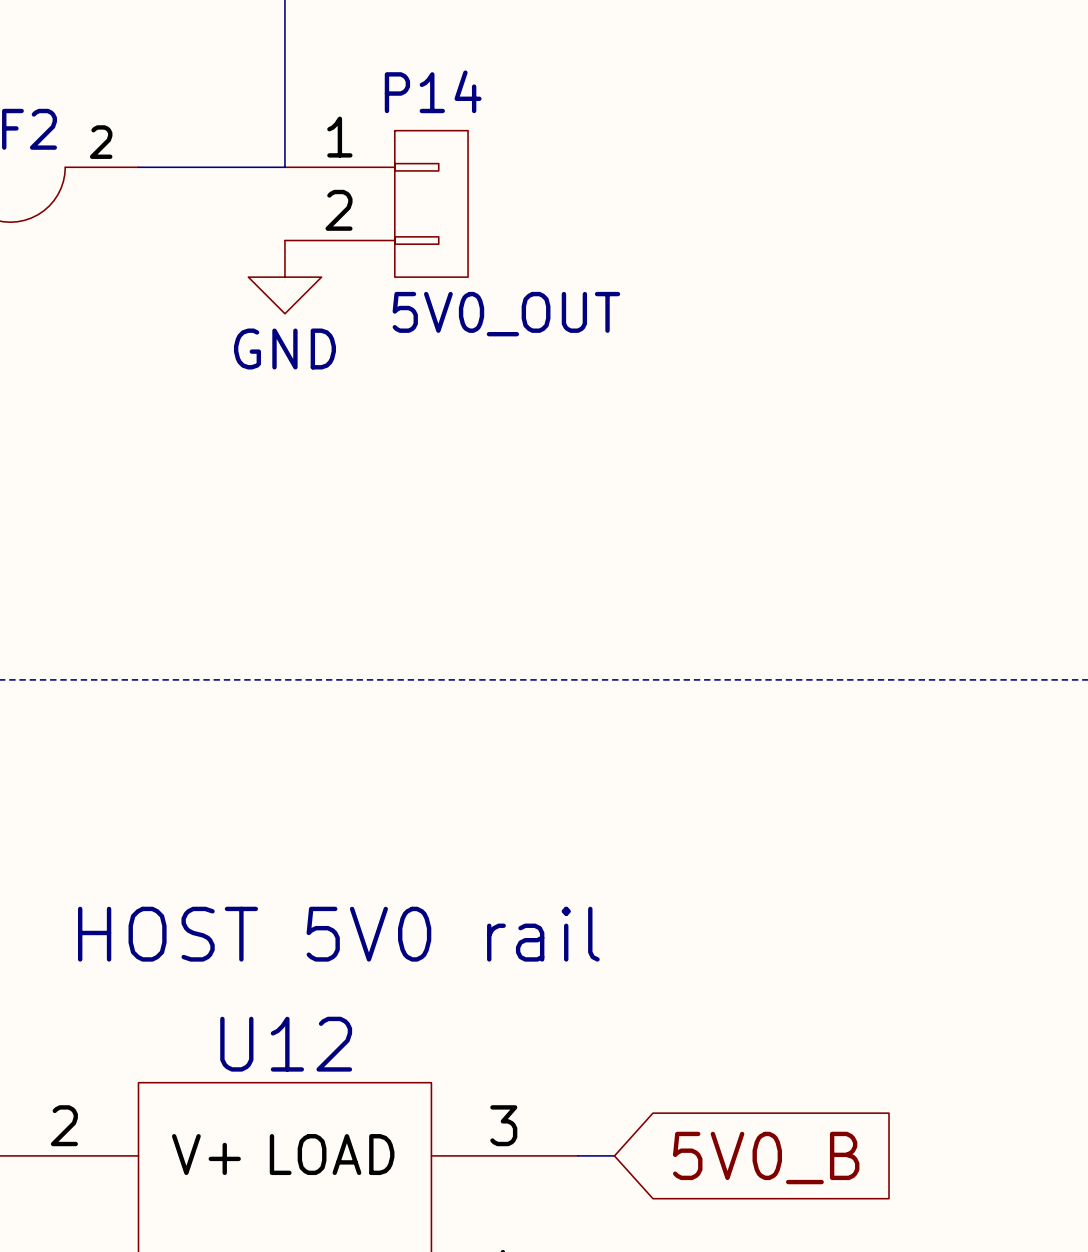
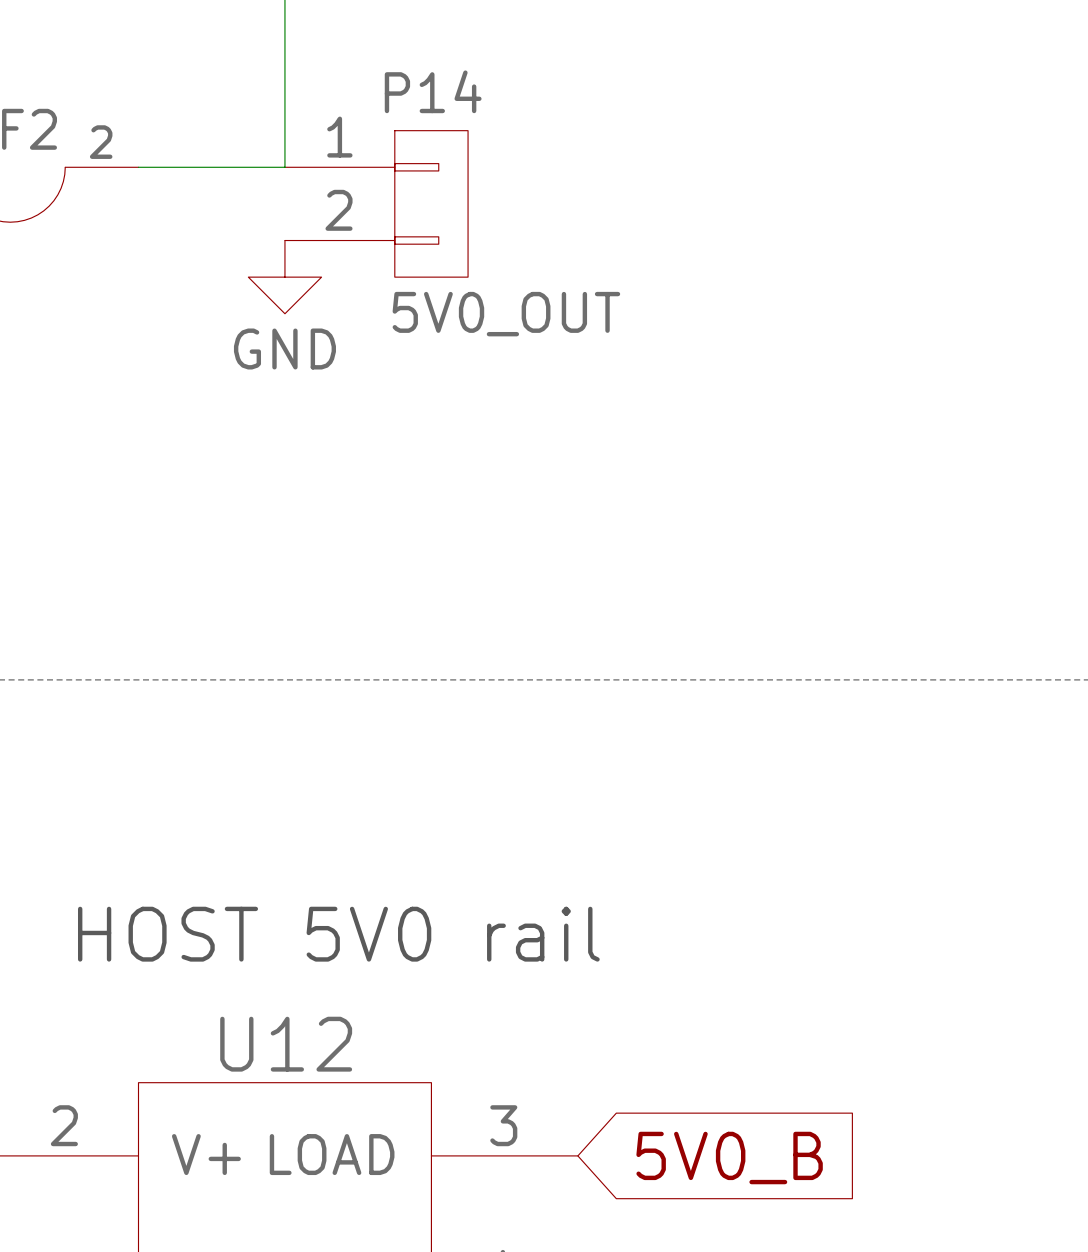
wire: (577, 1155) (614, 1155) -> none
global label position: 5V0_B (766, 1158) -> 5V0_B (729, 1158)

